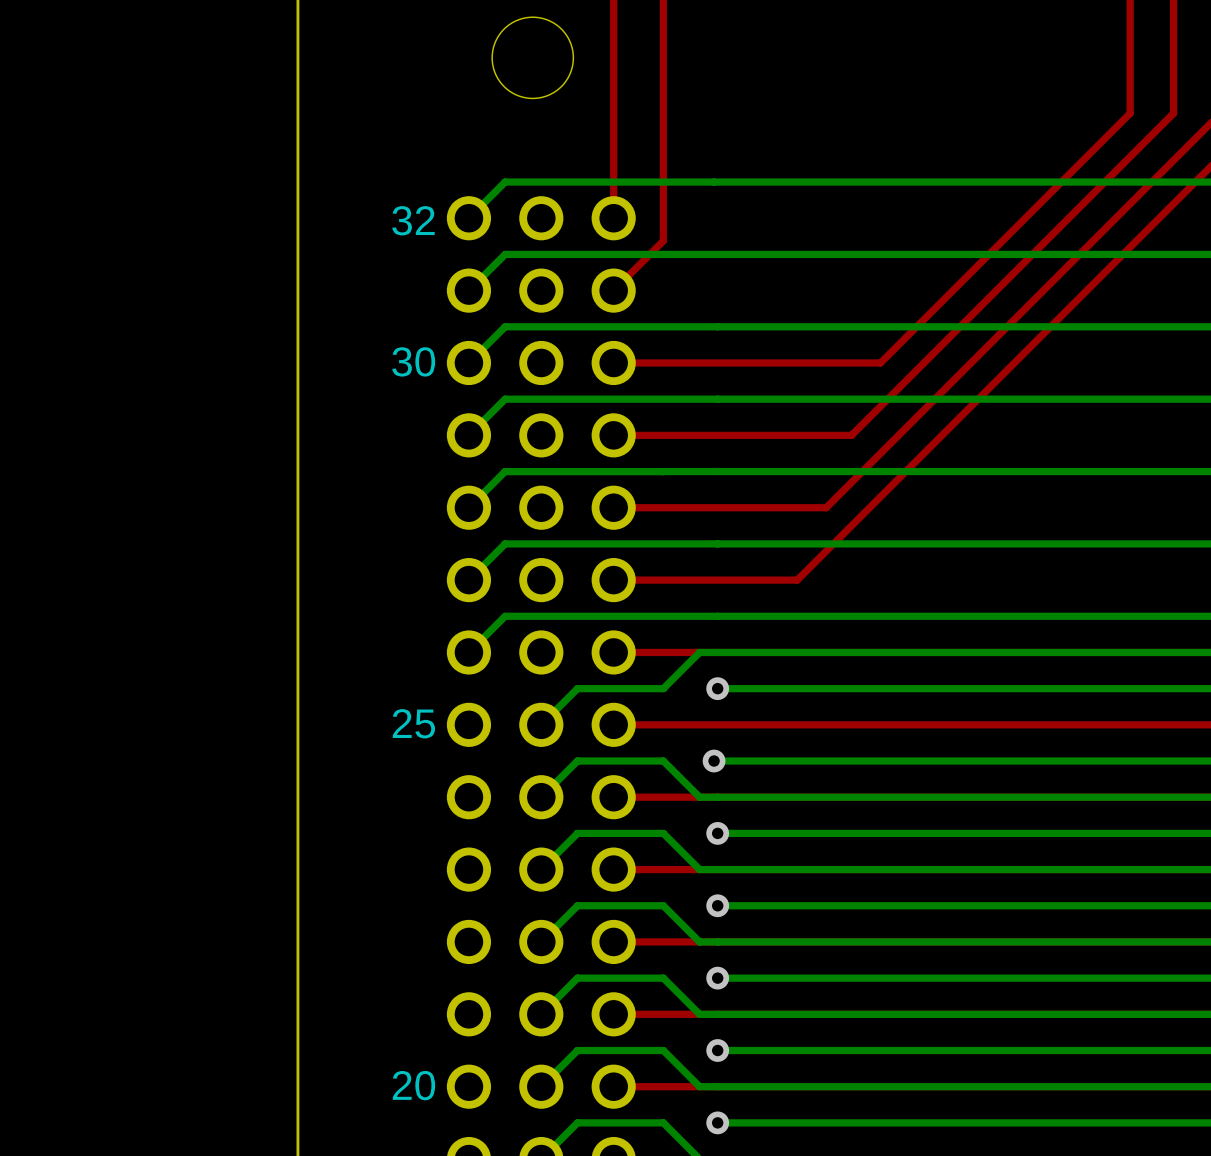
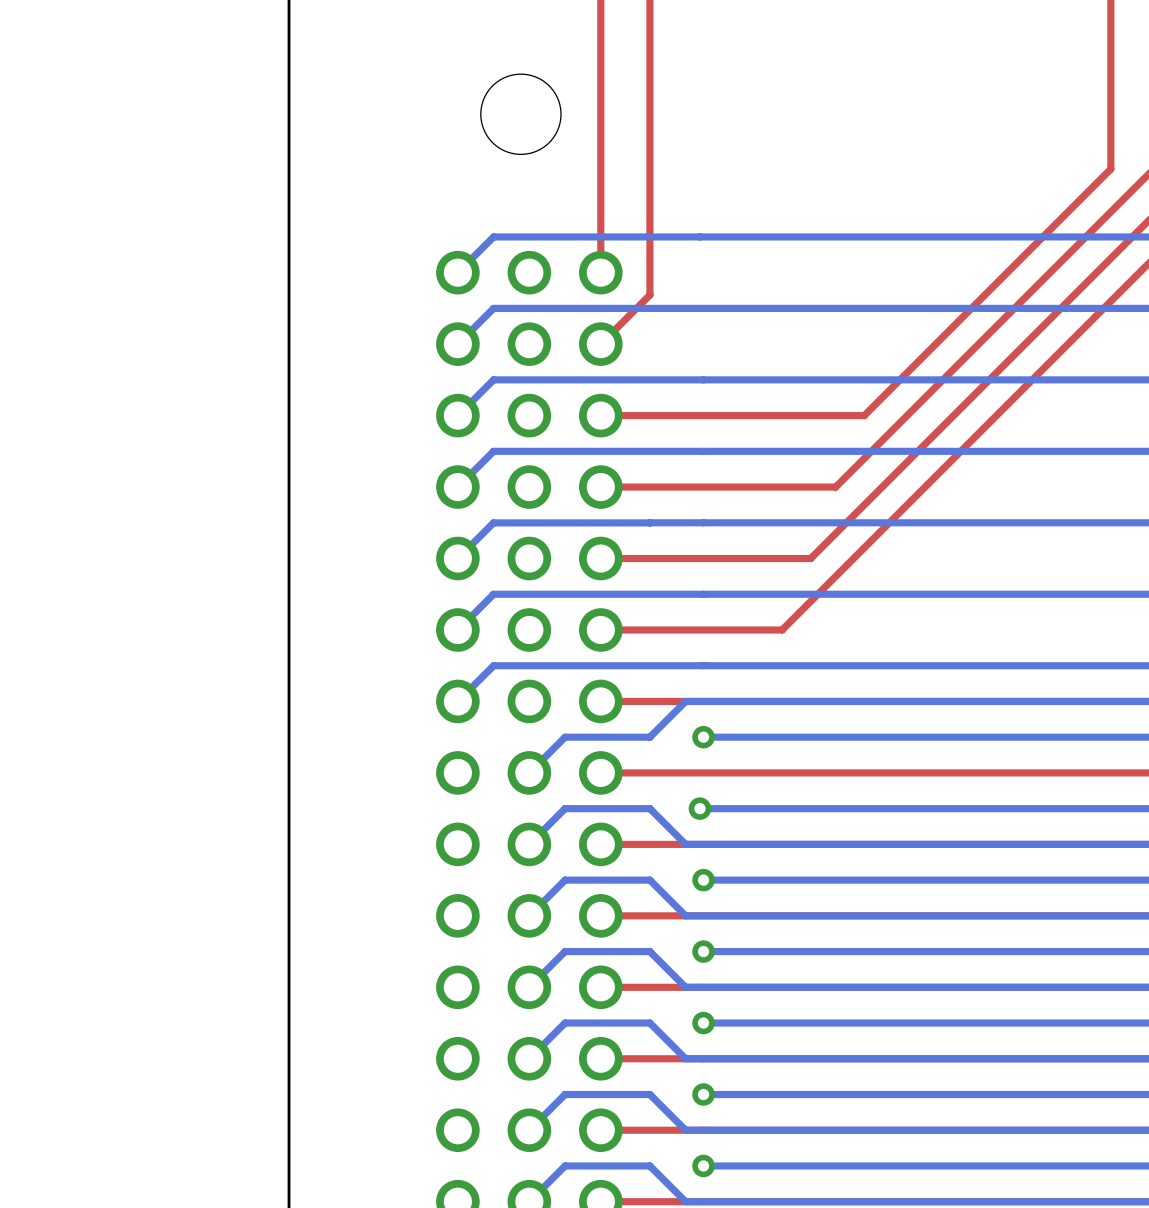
text: 32 (413, 220) -> none
text: 30 (413, 361) -> none
text: 25 (413, 723) -> none
text: 20 (413, 1085) -> none

